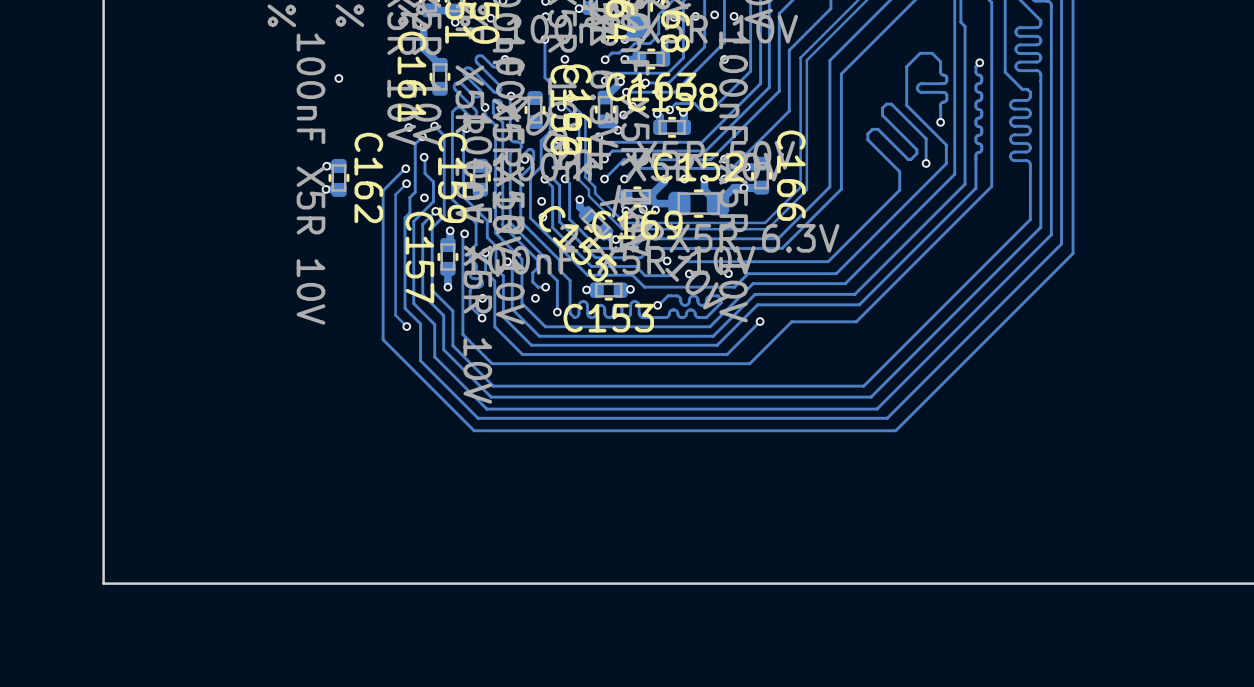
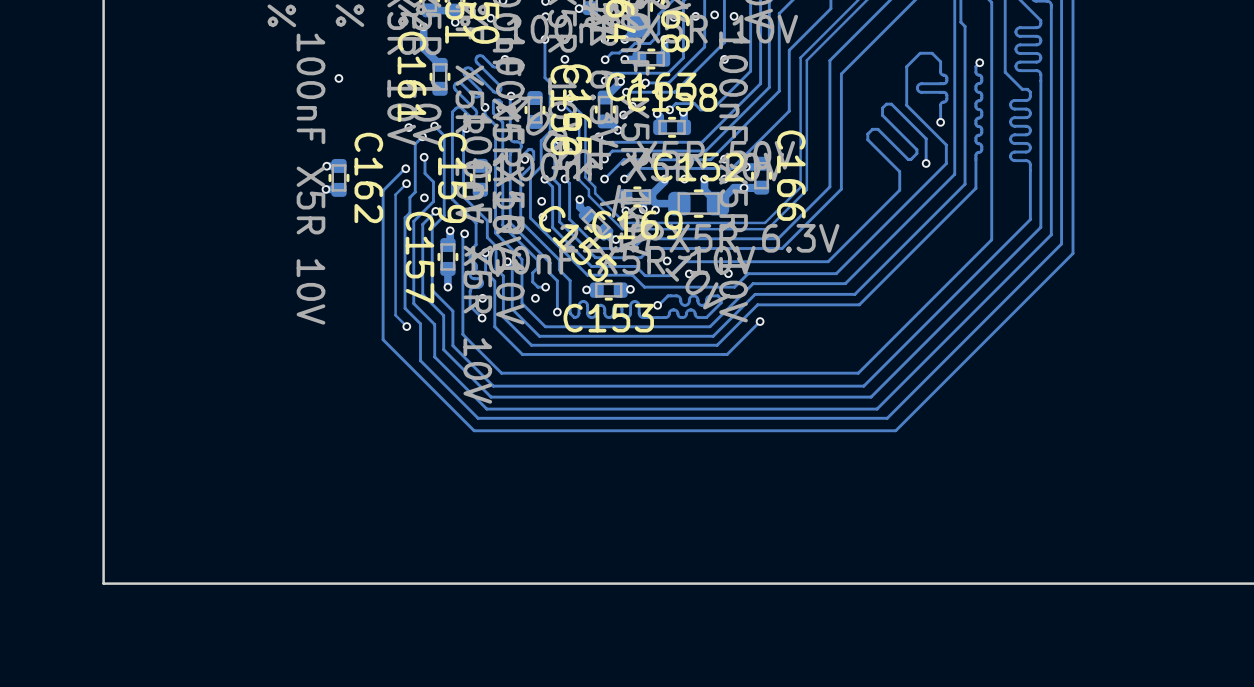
track: (991, 186) (856, 321) (791, 321) (749, 363) (492, 363) -> (991, 186) (991, 239) (858, 373) (501, 373) (492, 363)

